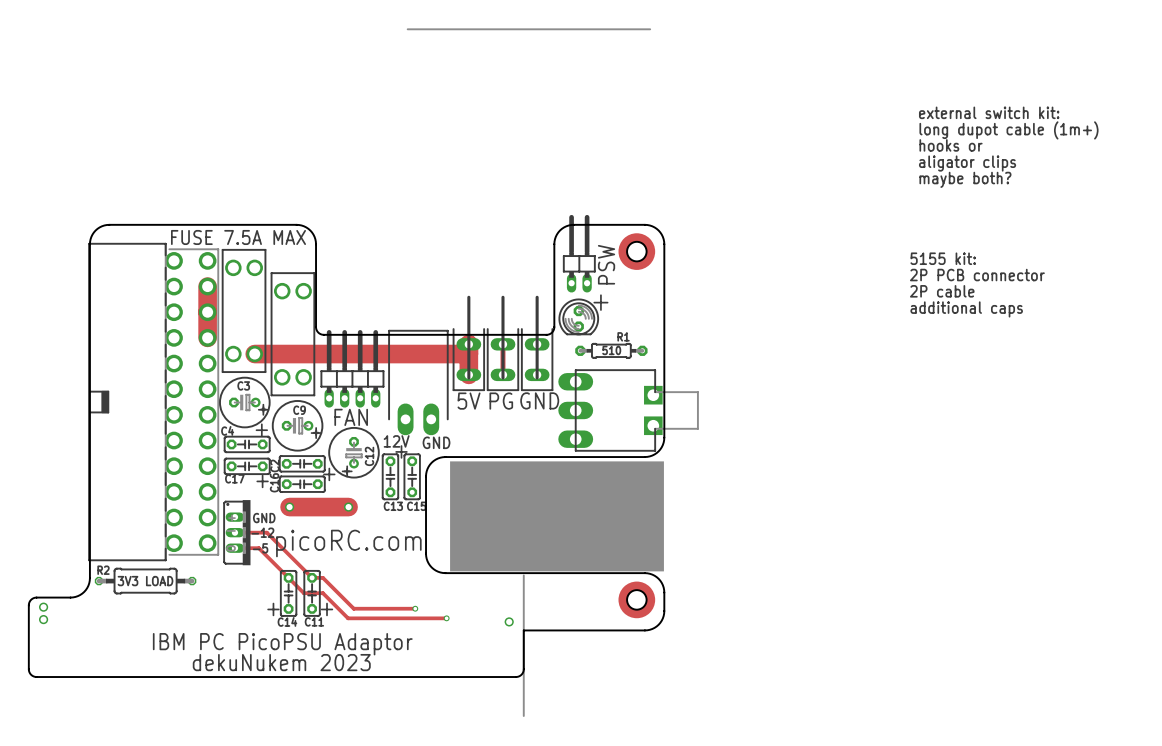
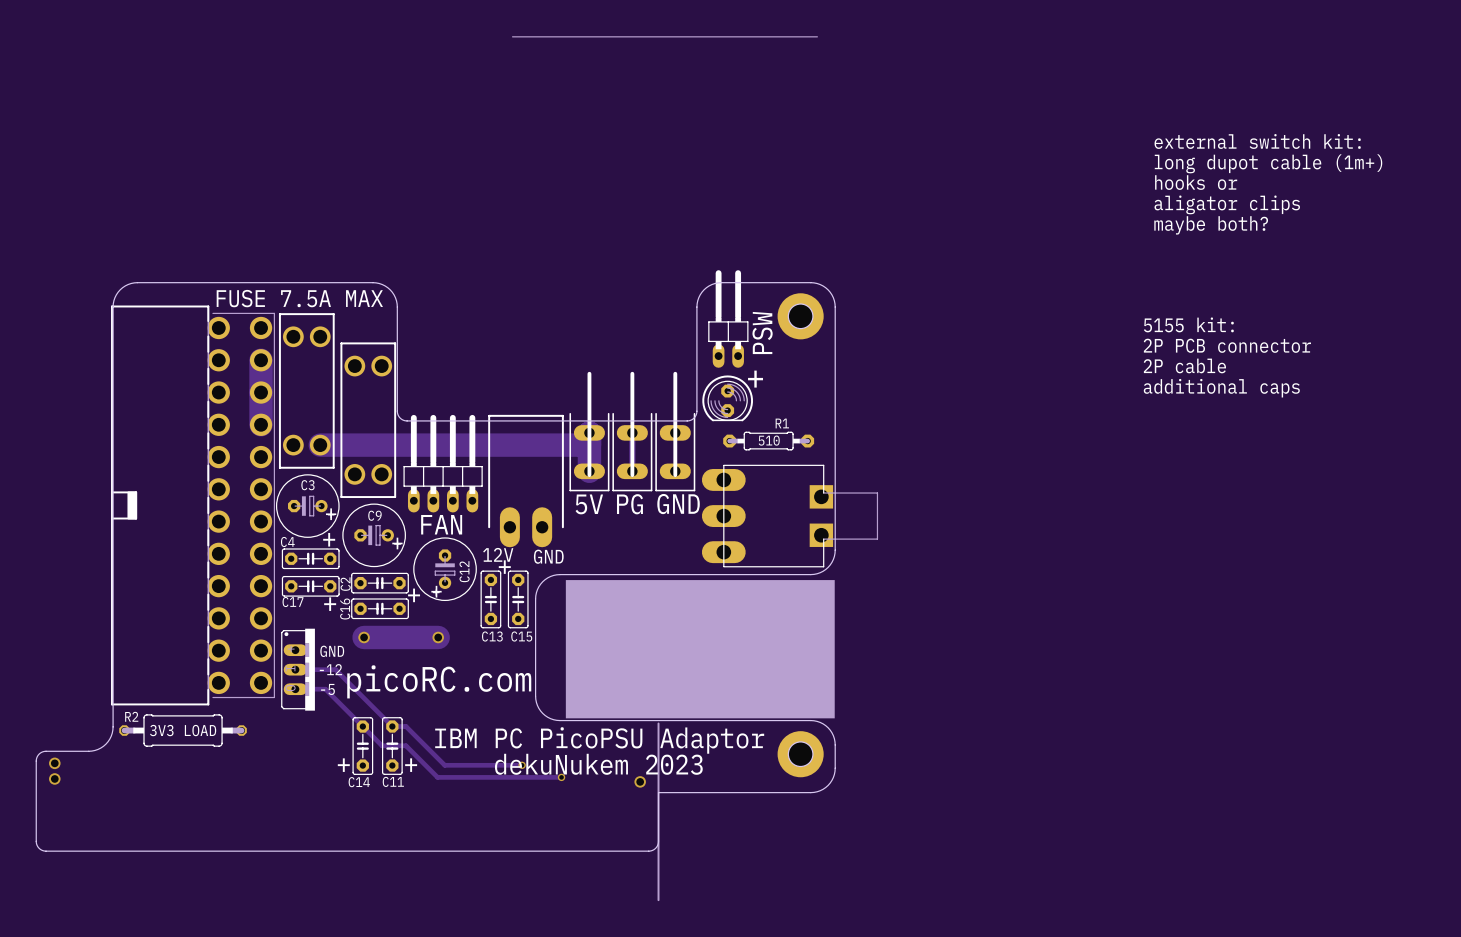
text: none -> IBM PC PicoPSU Adaptor (599, 740)
text: none -> dekuNukem 2023 (598, 764)
text: IBM PC PicoPSU Adaptor (282, 644) -> none
text: dekuNukem 2023 (281, 662) -> none

